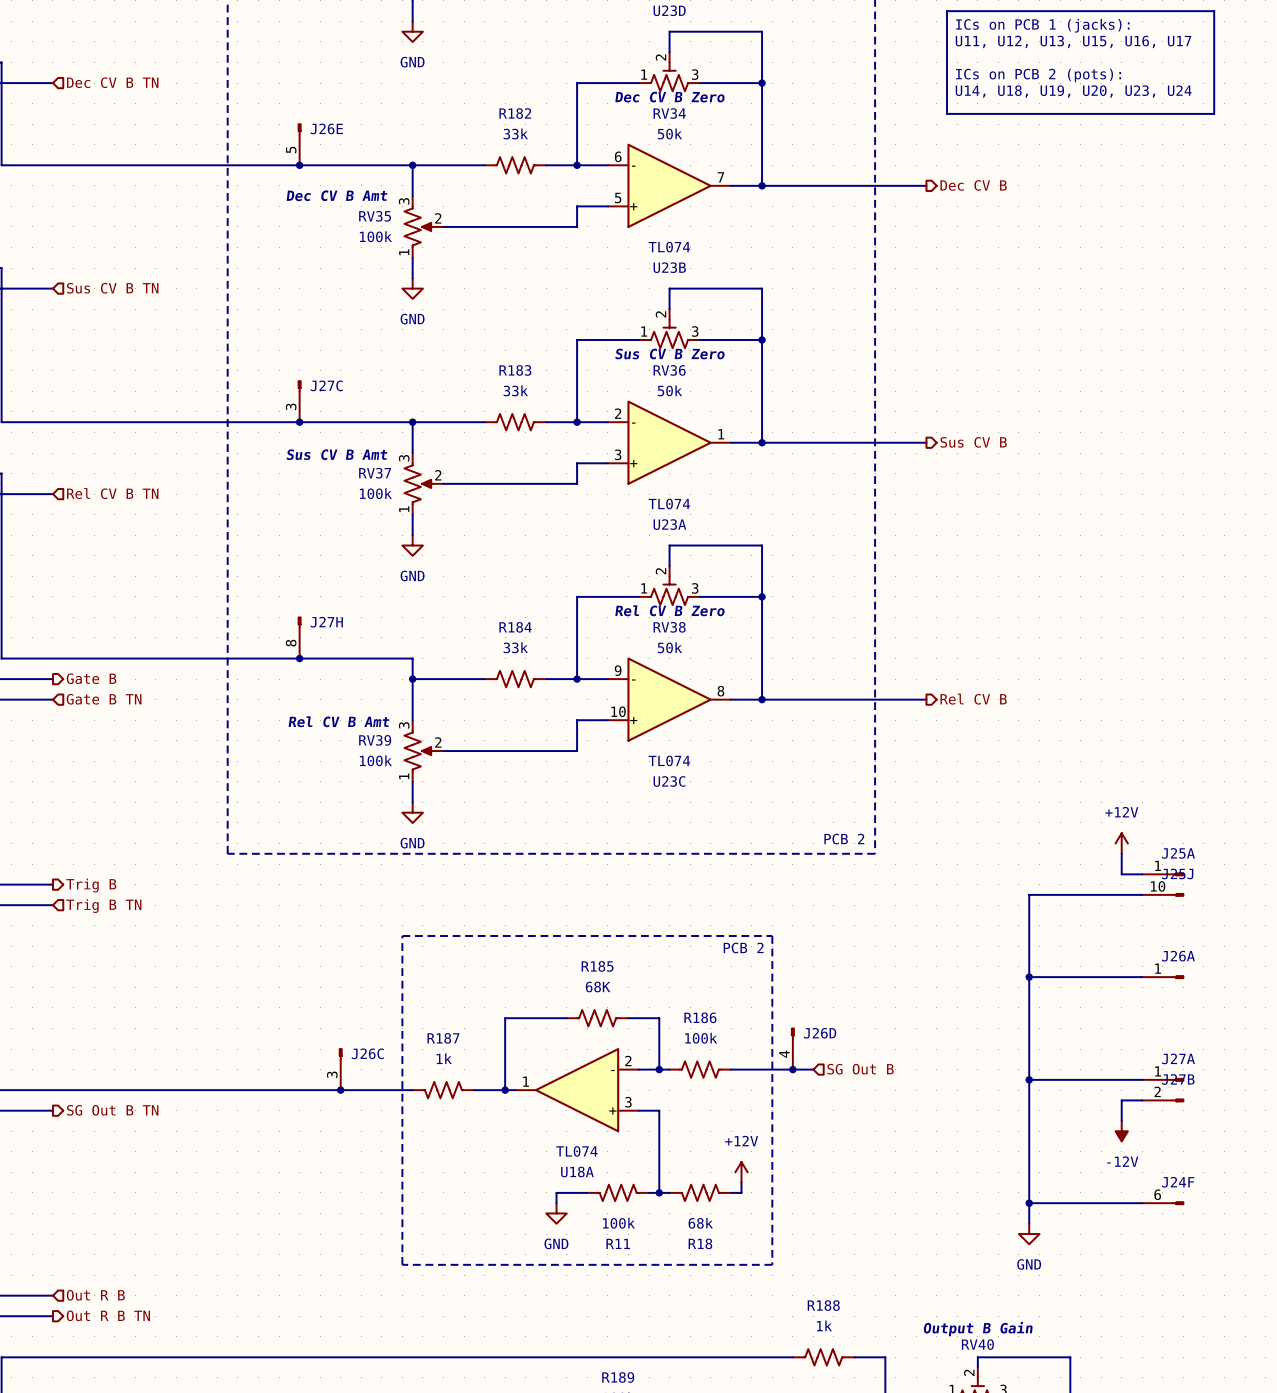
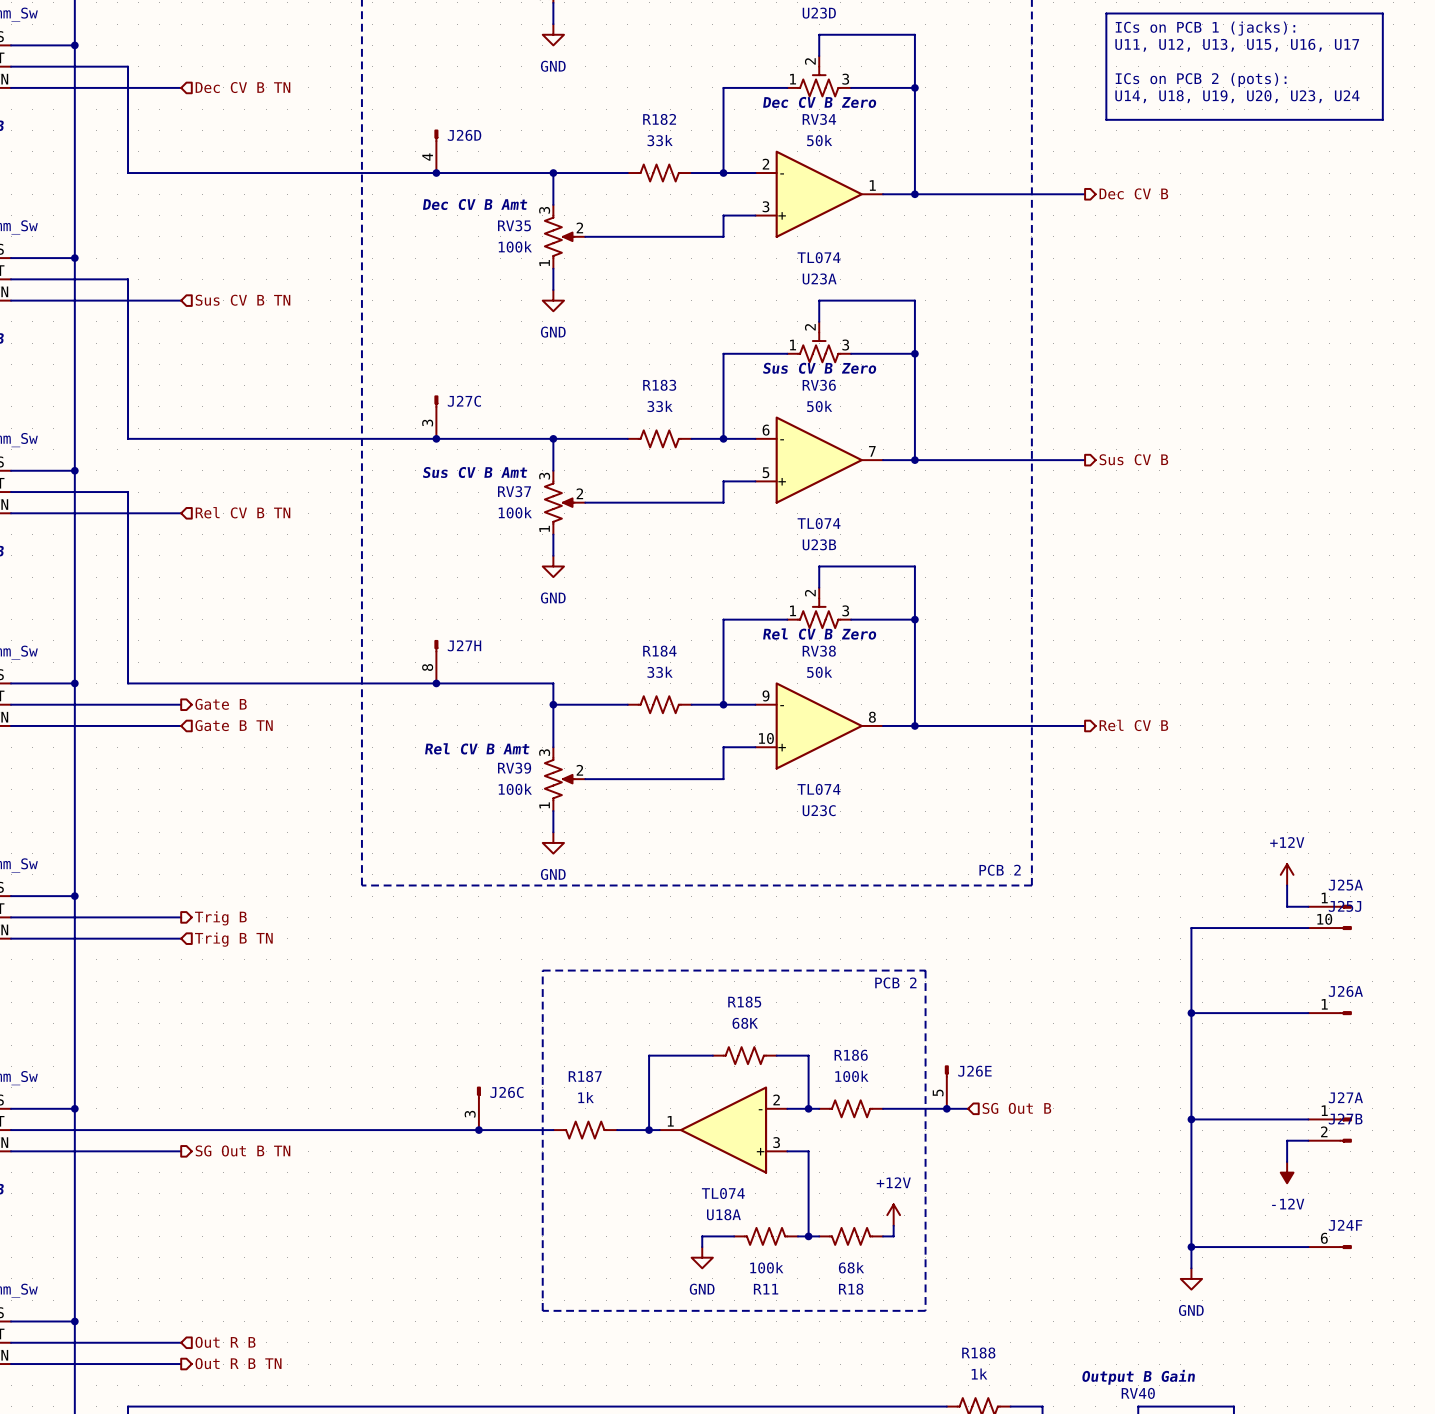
J26E position: (299, 144) -> (946, 1087)
U23B position: (669, 185) -> (819, 460)
U23A position: (669, 442) -> (819, 194)
J26D position: (792, 1048) -> (436, 151)

